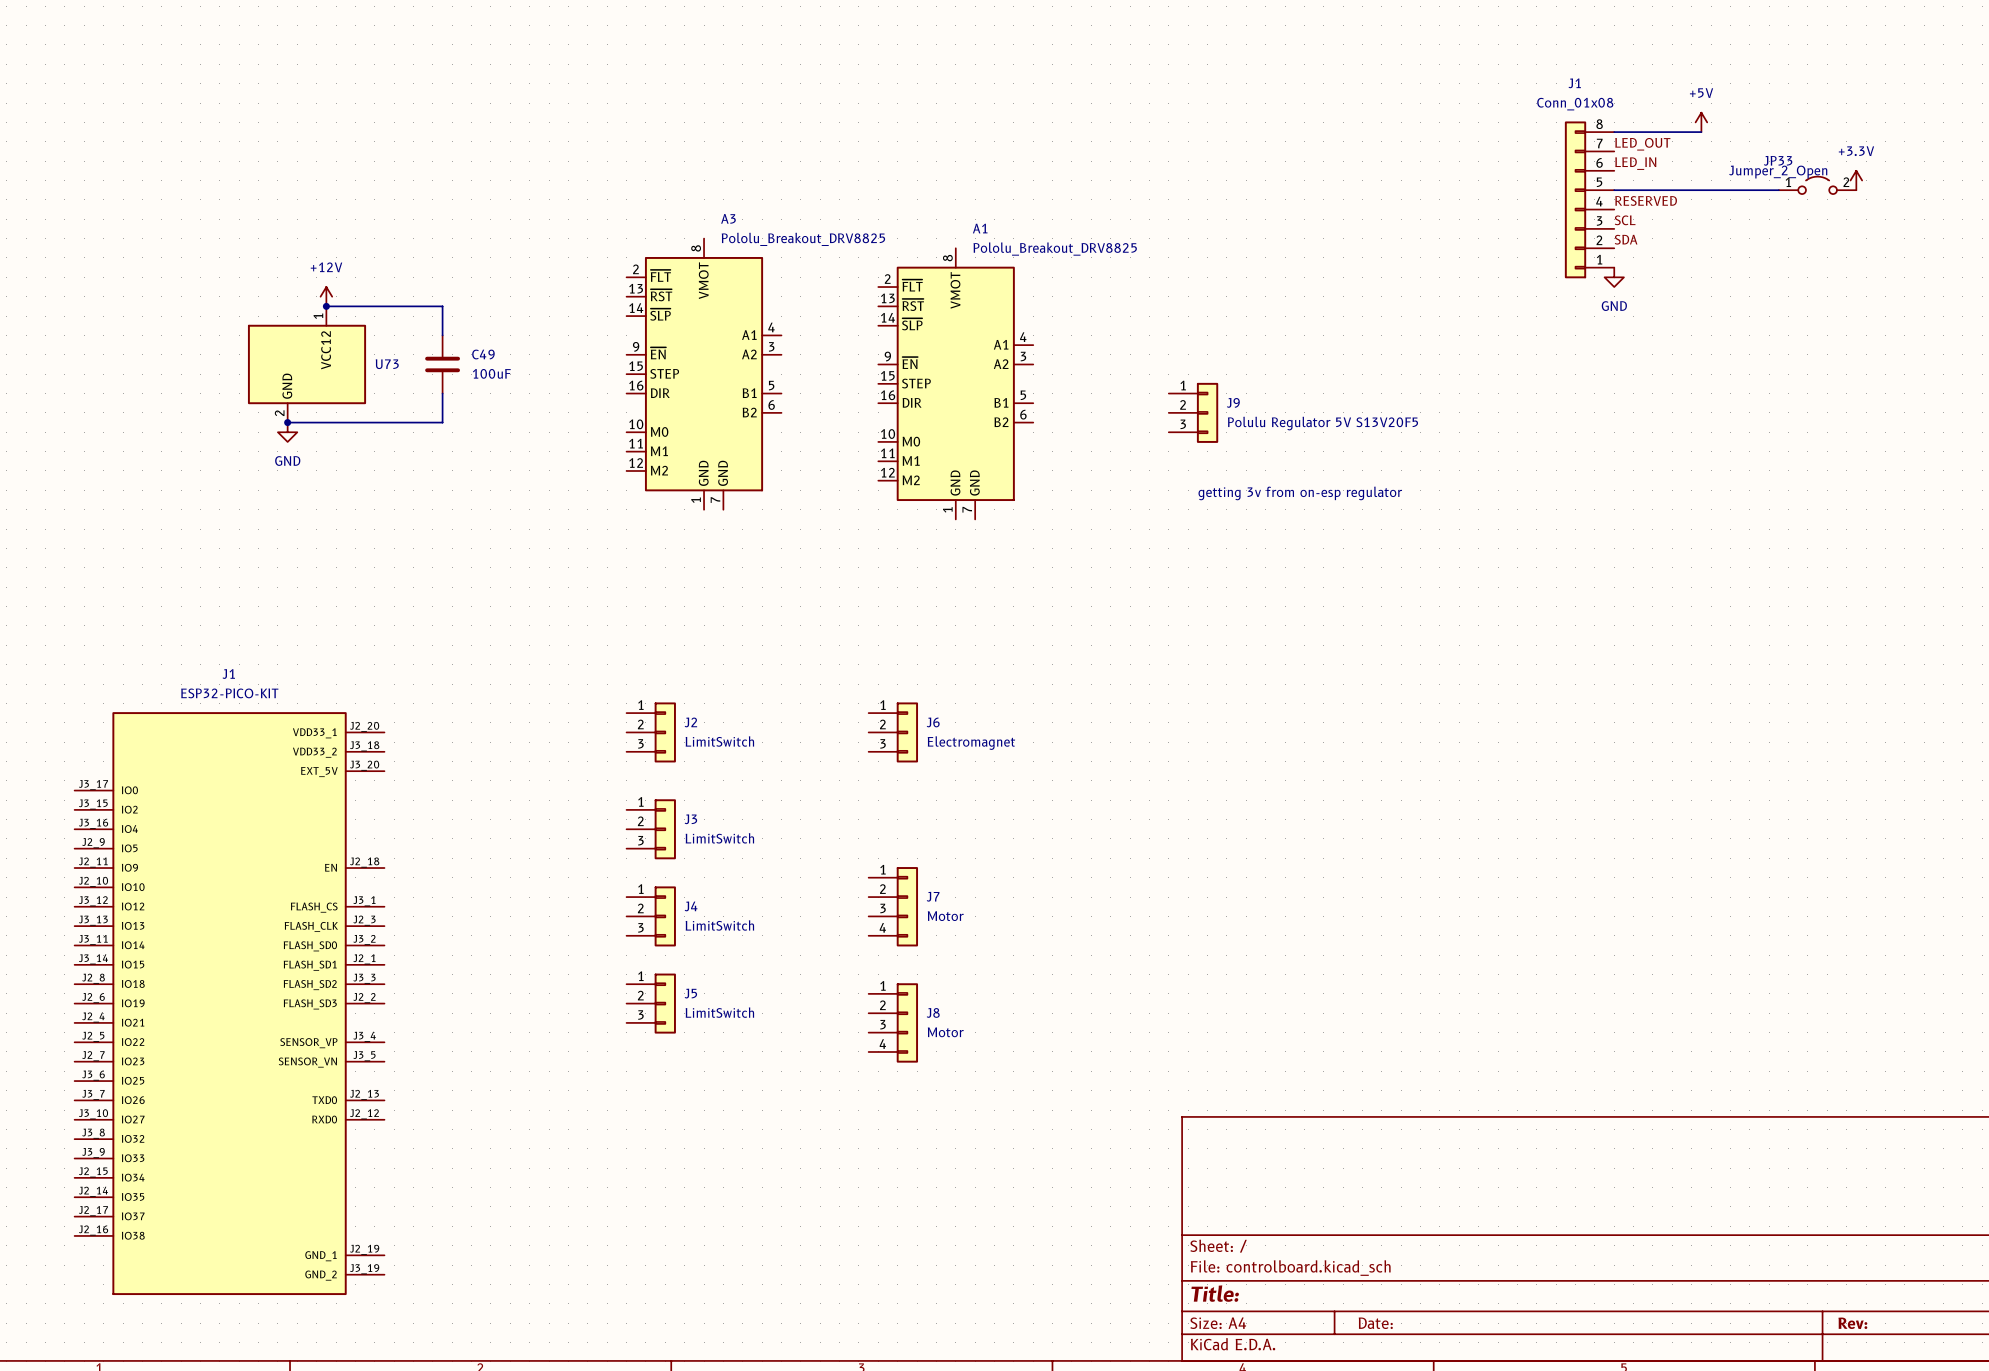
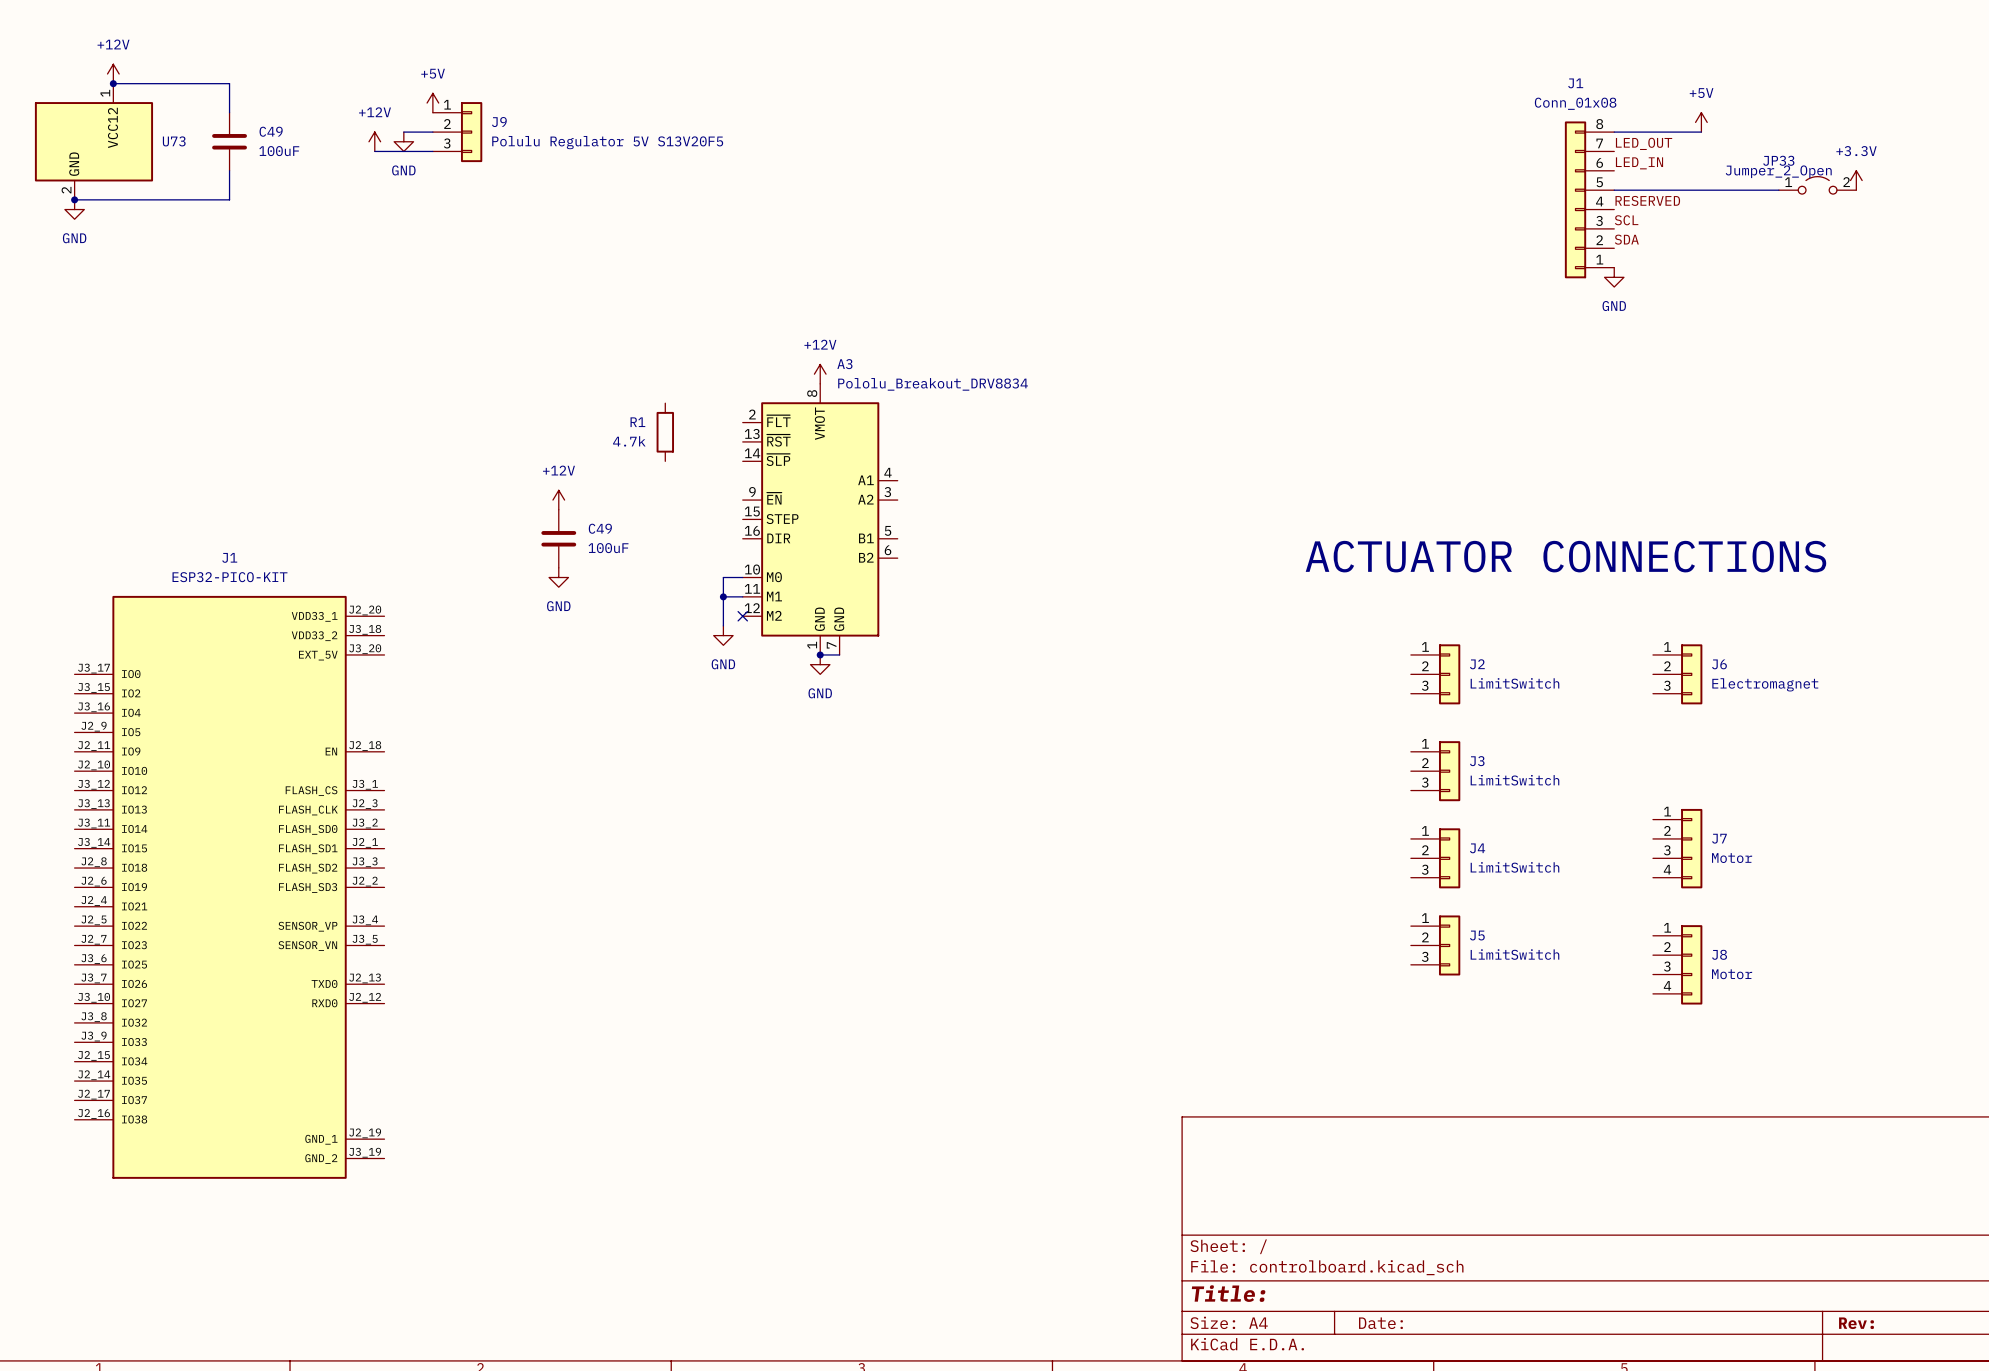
power symbol: none -> +12V (113, 73)
wire: none -> (113, 83) (229, 83) (229, 112)
junction: none -> (113, 83)
power symbol: none -> +5V (432, 103)
wire: none -> (403, 132) (432, 132)
C49: none -> 100uF (229, 141)
power symbol: none -> +12V (374, 141)
power symbol: none -> GND (403, 141)
wire: none -> (374, 151) (432, 151)
wire: none -> (229, 170) (229, 199) (74, 199)
junction: none -> (74, 199)
power symbol: none -> GND (74, 209)
A3 value: Pololu_Breakout_DRV8825 (803, 239) -> Pololu_Breakout_DRV8834 (933, 384)
power symbol: +12V (326, 296) -> none
wire: (326, 306) (442, 306) (442, 335) -> none
junction: (326, 306) -> none
U73 position: (307, 364) -> (93, 141)
C49: 100uF (442, 364) -> none
A3 position: (704, 374) -> (820, 519)
power symbol: none -> +12V (820, 374)
A1: Pololu_Breakout_DRV8825 (955, 383) -> none
wire: (442, 393) (442, 422) (287, 422) -> none
J9 position: (1193, 412) -> (457, 132)
junction: (287, 422) -> none
power symbol: GND (287, 432) -> none
R1: none -> 4.7k (665, 432)
text: getting 3v from on-esp regulator (1300, 493) -> none
power symbol: none -> +12V (558, 500)
C49: none -> 100uF (558, 538)
text: none -> ACTUATOR CONNECTIONS (1565, 556)
power symbol: none -> GND (558, 577)
wire: none -> (742, 577) (723, 577) (723, 625)
wire: none -> (723, 596) (742, 596)
junction: none -> (723, 596)
no-connect mark: none -> (742, 616)
power symbol: none -> GND (723, 635)
wire: none -> (820, 654) (839, 654)
junction: none -> (820, 654)
power symbol: none -> GND (820, 664)
J2 position: (651, 732) -> (1435, 674)
J6 position: (893, 732) -> (1677, 674)
J3 position: (651, 829) -> (1435, 771)
J7 position: (893, 906) -> (1677, 848)
J4 position: (651, 916) -> (1435, 858)
J1 position: (229, 1003) -> (229, 887)
J5 position: (651, 1003) -> (1435, 945)
J8 position: (893, 1022) -> (1677, 964)

